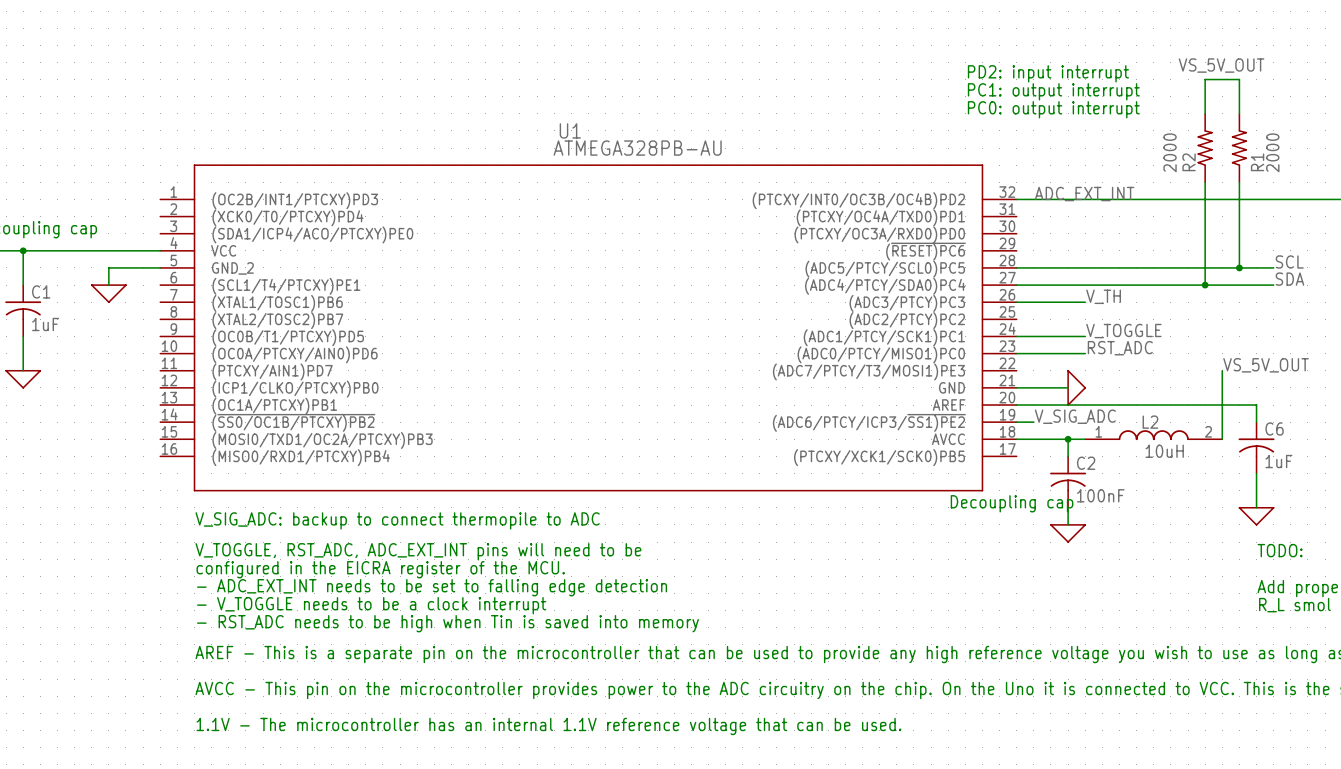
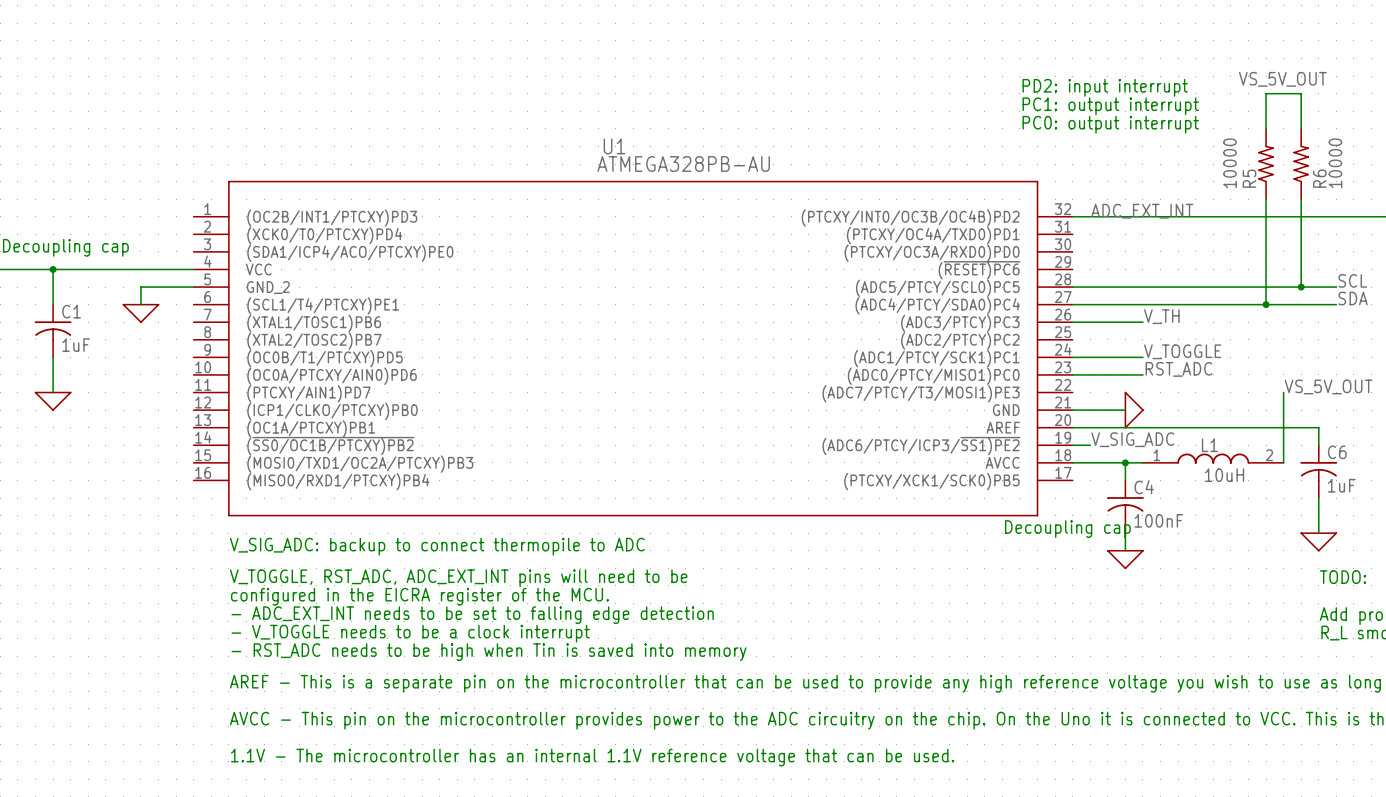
R2 value: 2000 (1170, 152) -> 10000 (1230, 163)
R1 value: 2000 (1272, 152) -> 10000 (1335, 163)
R2 name: R2 (1189, 162) -> R5 (1249, 178)
R1 name: R1 (1257, 162) -> R6 (1319, 178)
L2 name: L2 (1150, 422) -> L1 (1209, 445)
C2 name: C2 (1086, 463) -> C4 (1144, 487)

